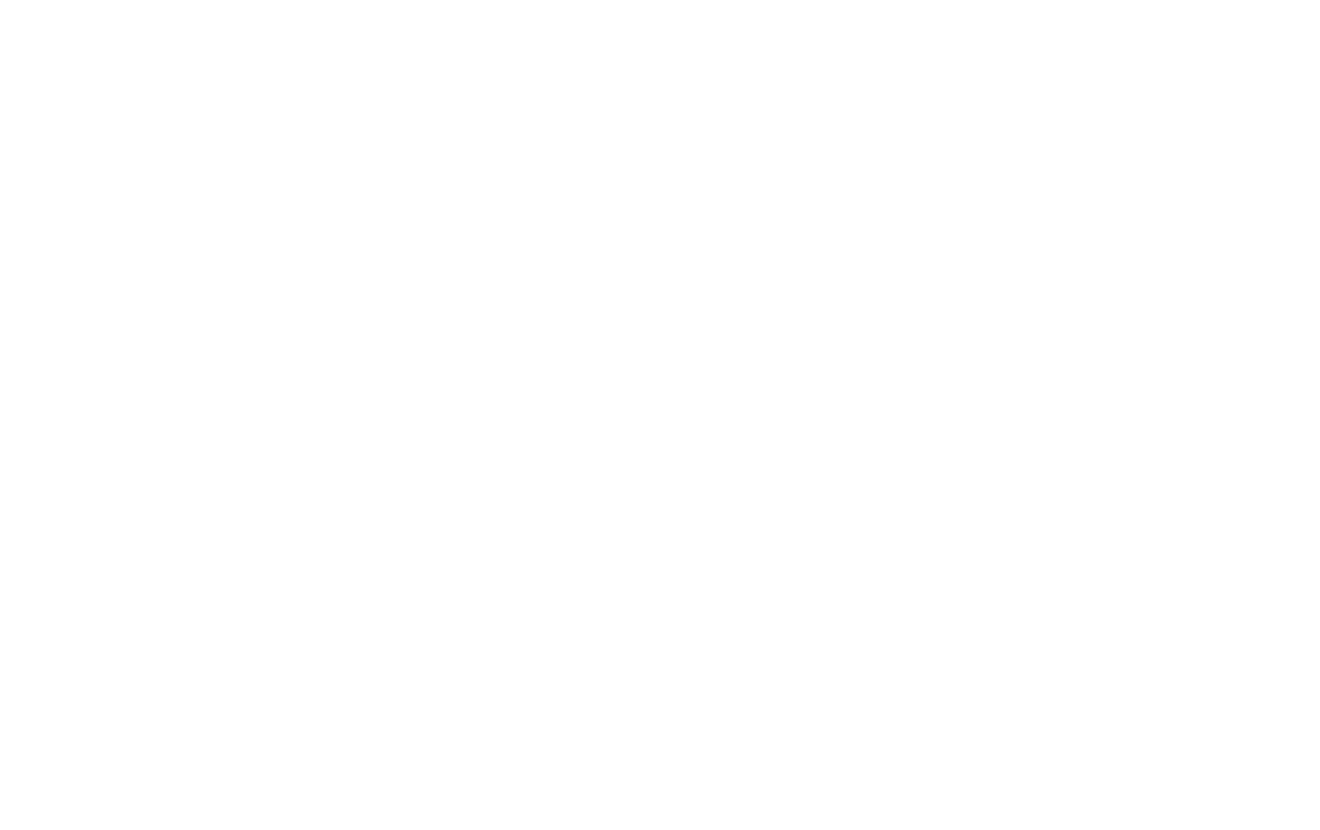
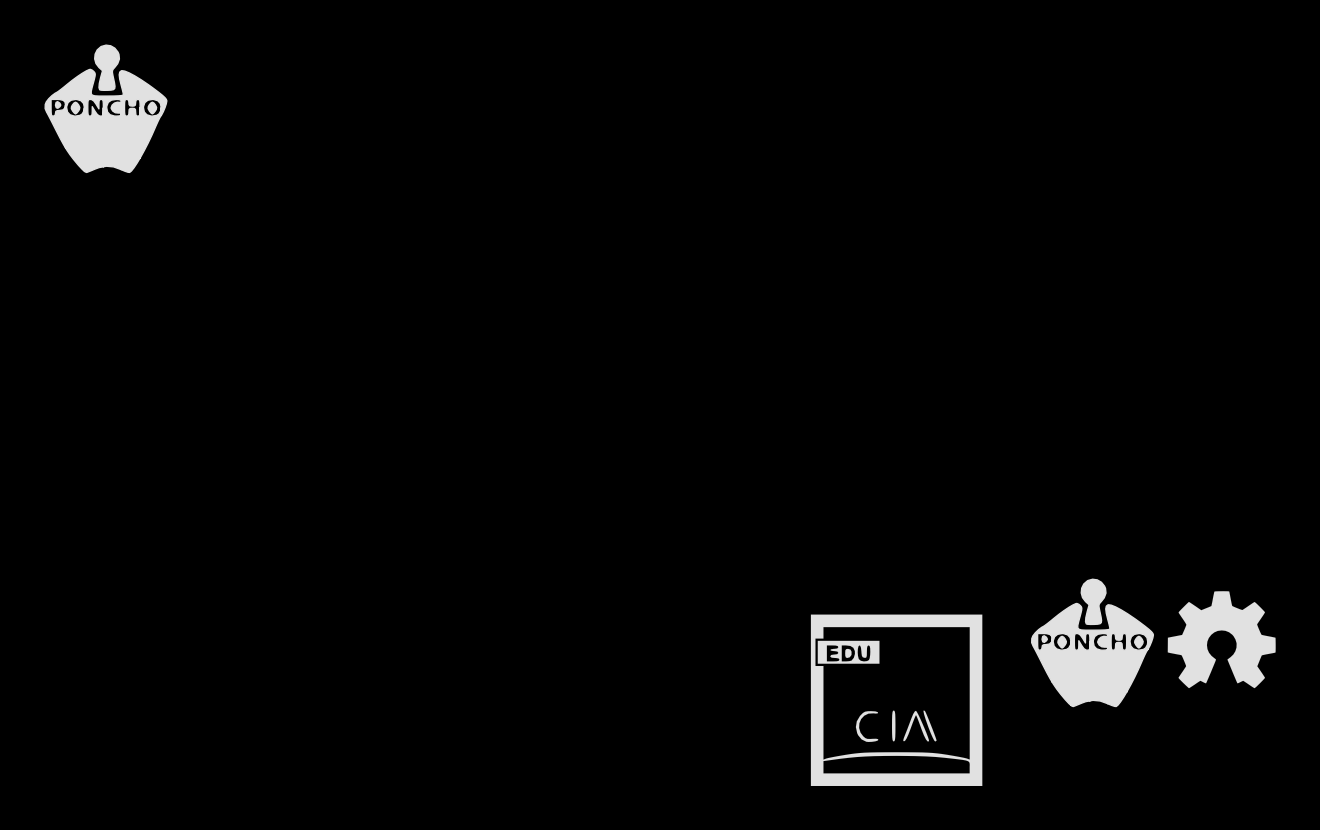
drawing: none -> [44, 44, 168, 174]
drawing: none -> [1031, 578, 1276, 708]
drawing: none -> [810, 614, 983, 787]

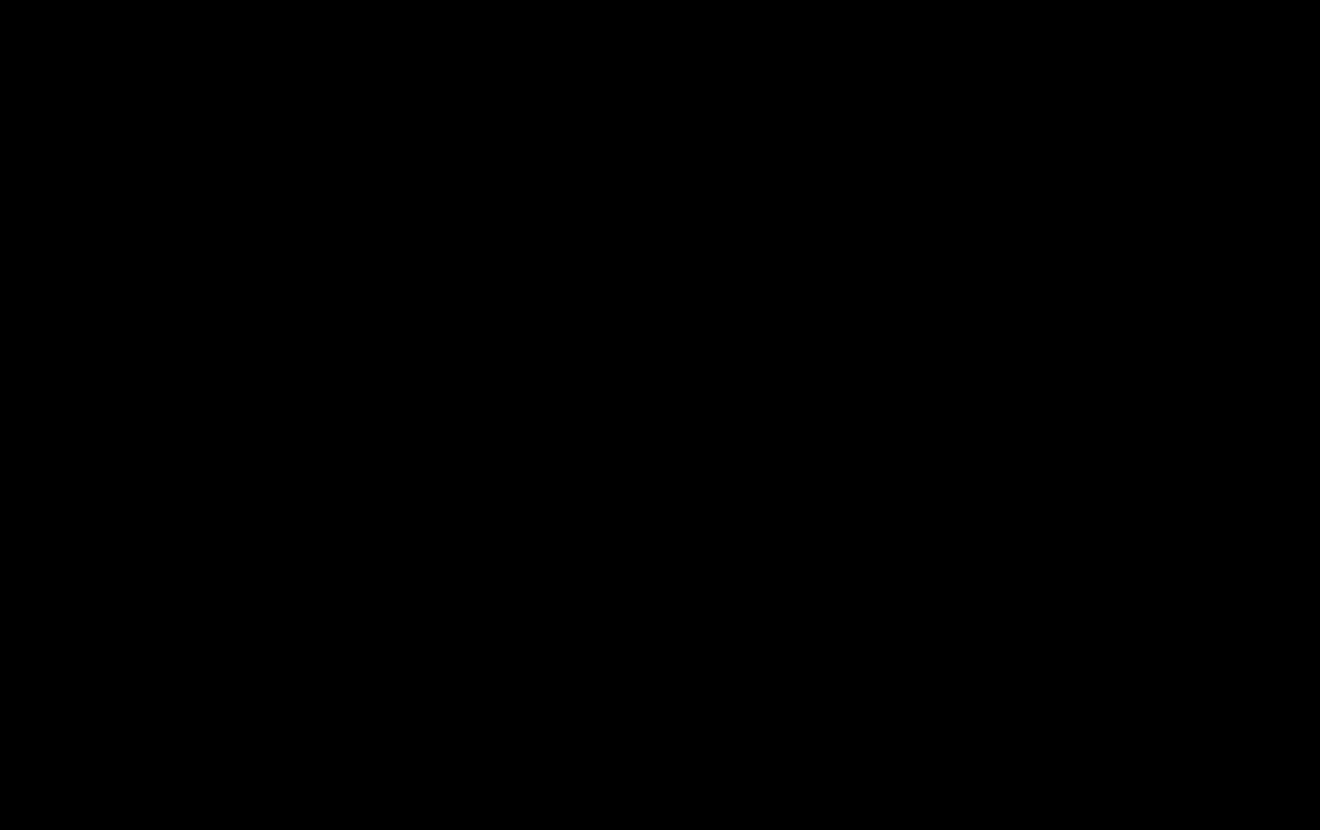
drawing: [44, 44, 168, 174] -> none
drawing: [1031, 578, 1276, 708] -> none
drawing: [810, 614, 983, 787] -> none

